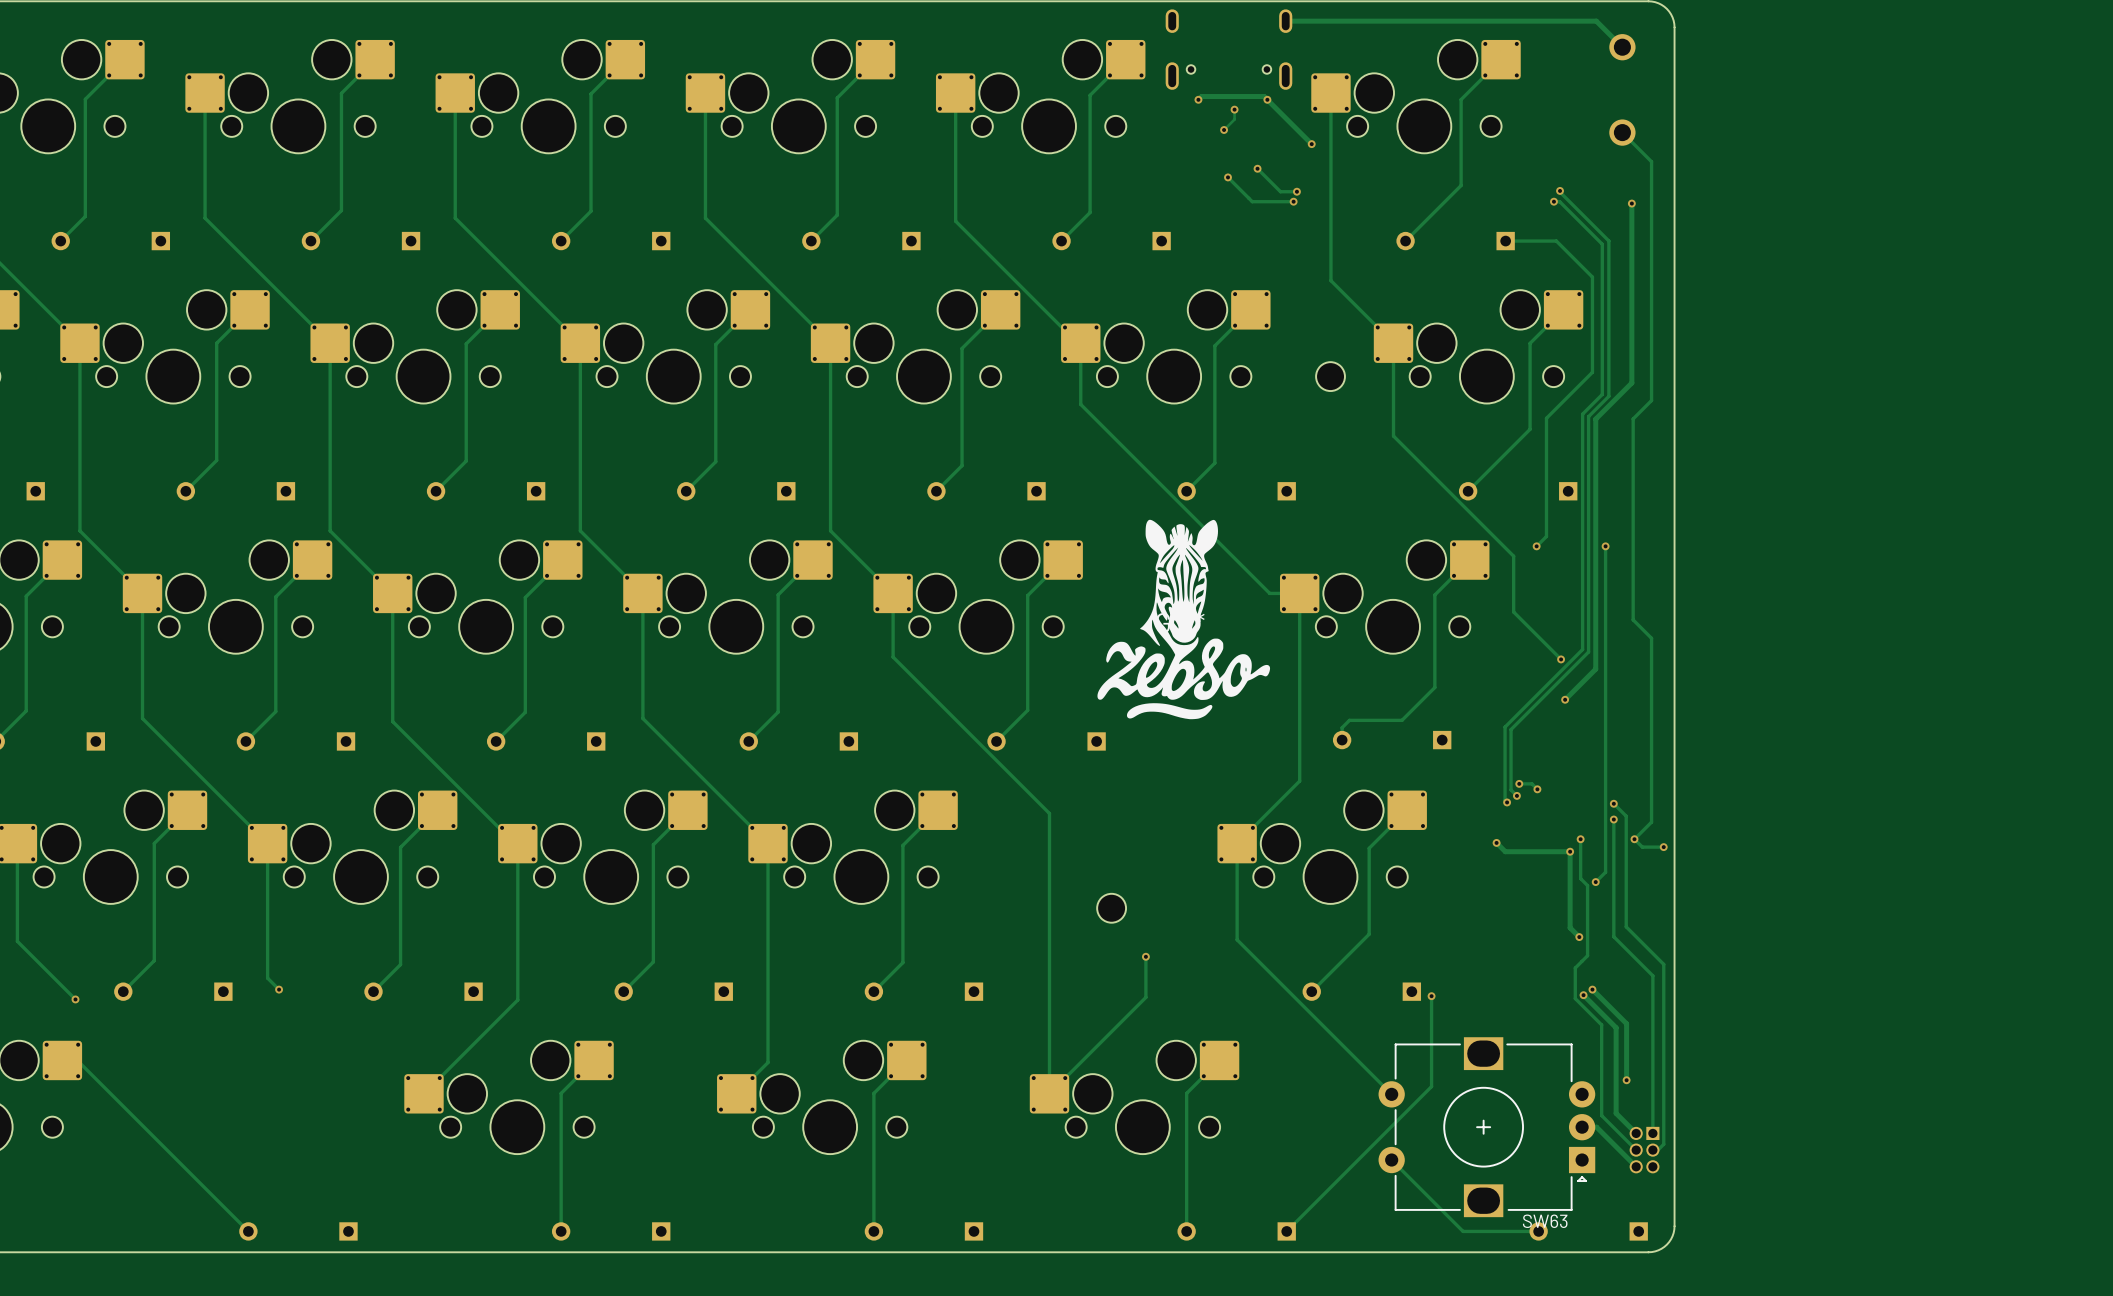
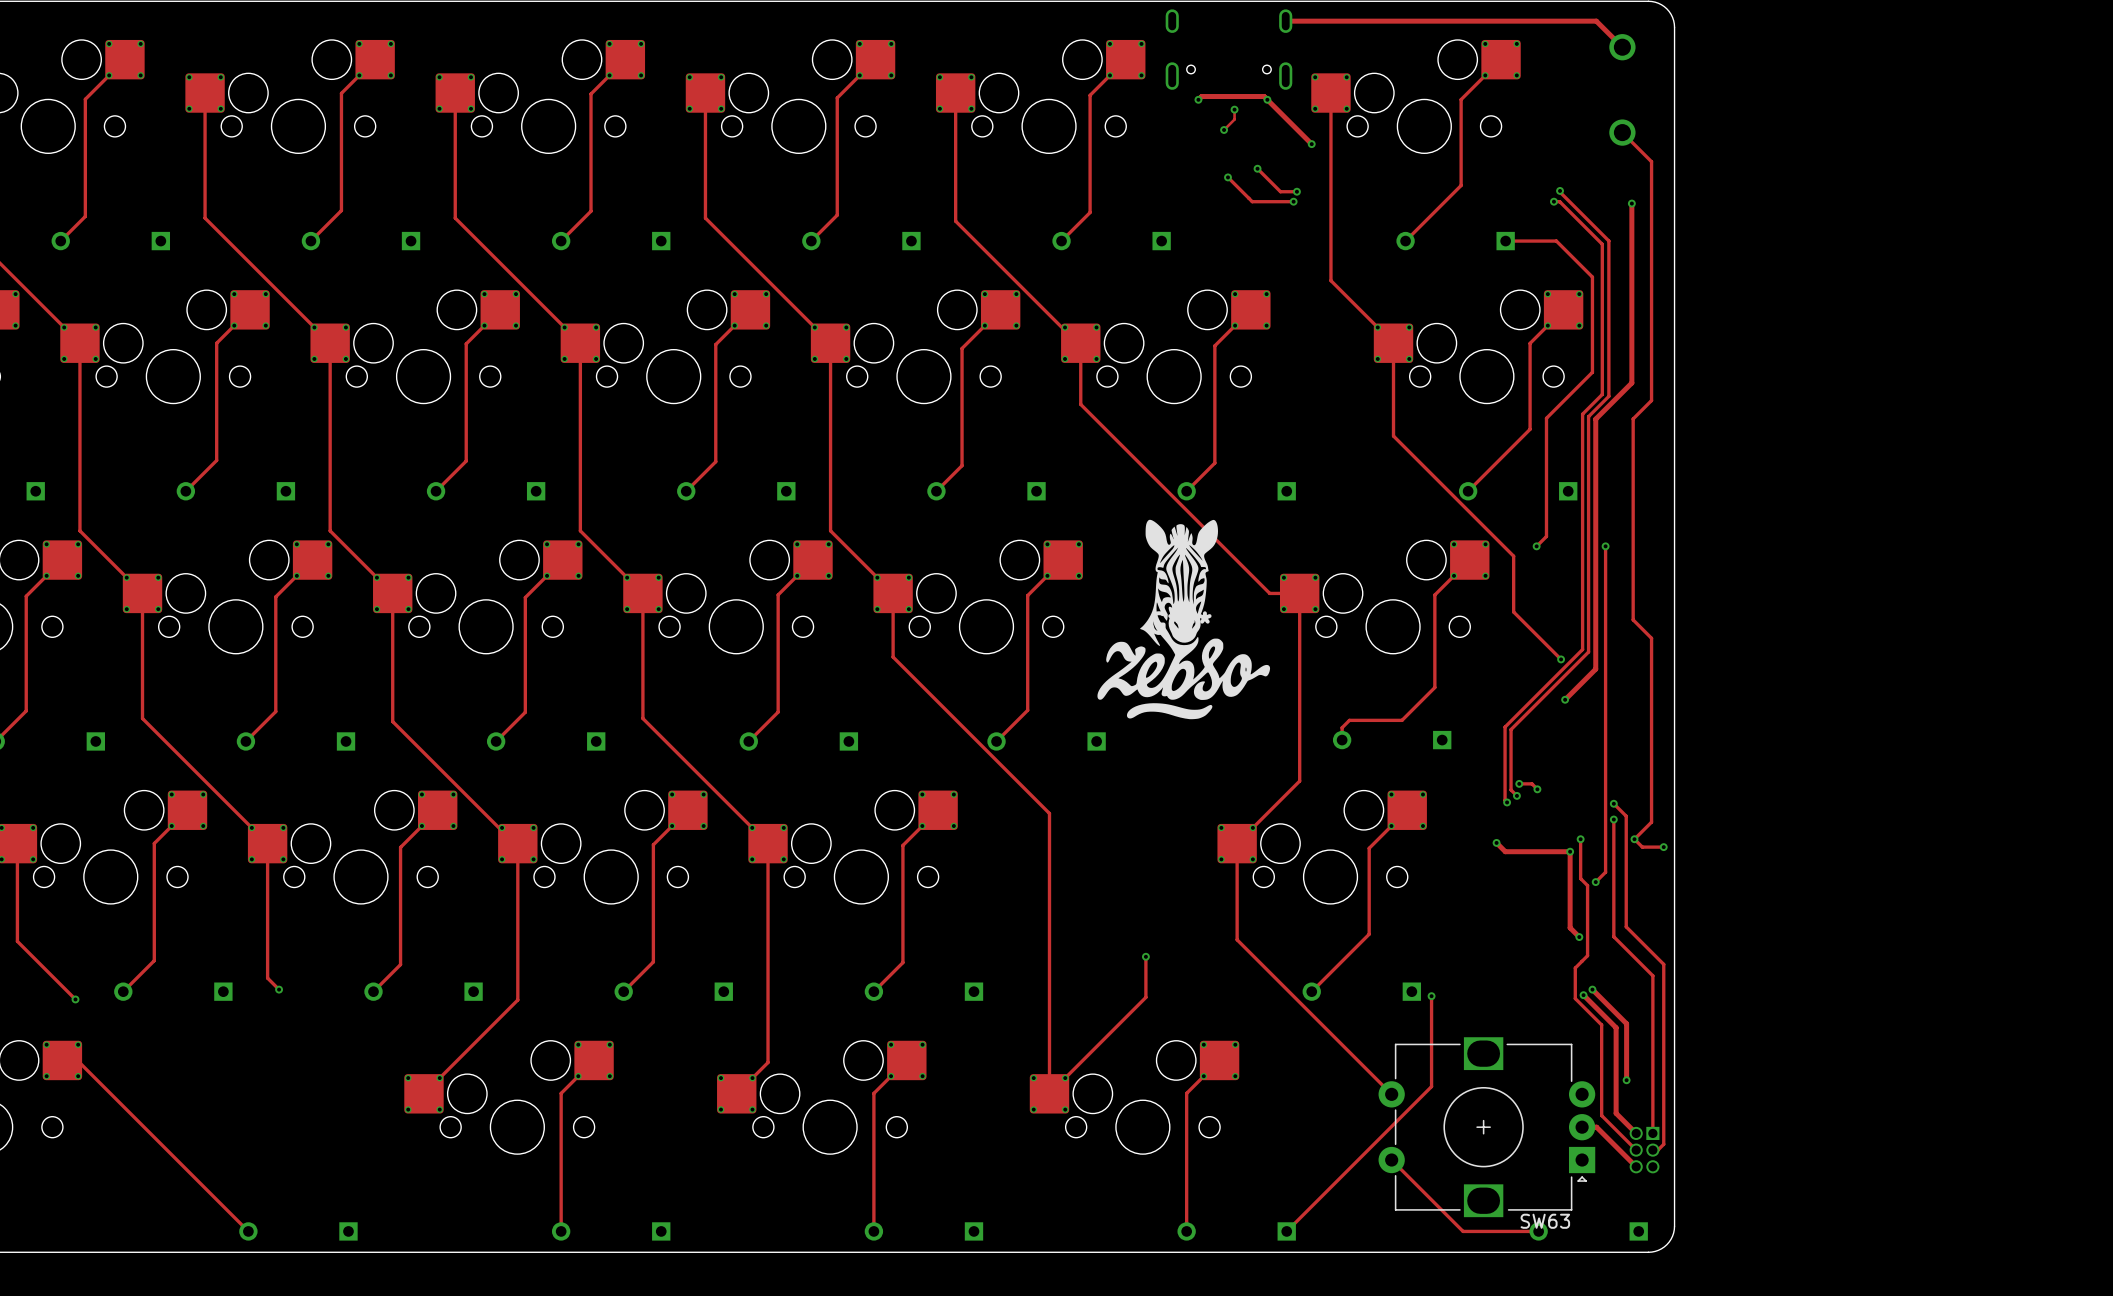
part: (1330, 376) -> none
part: (1111, 908) -> none

